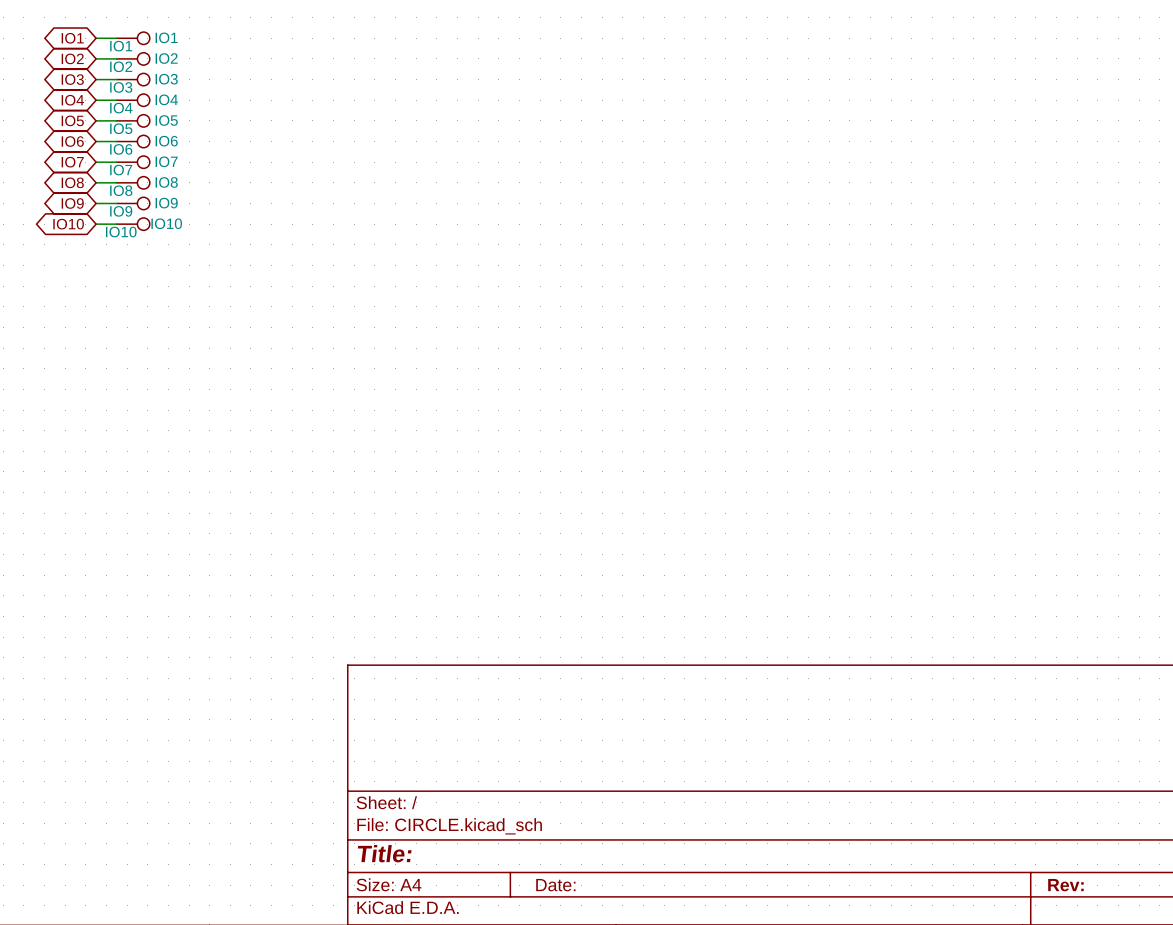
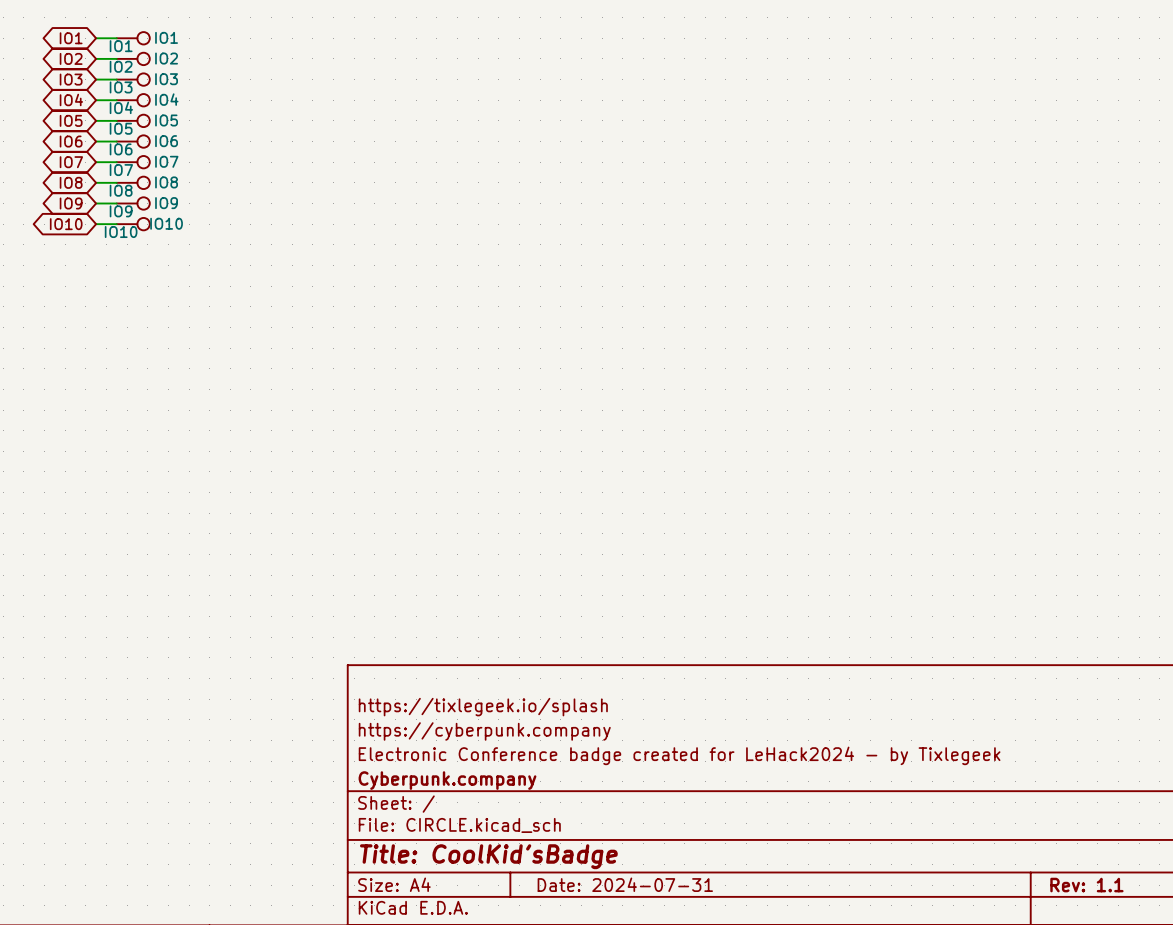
title block: none -> https://tixlegeek.io/splash (483, 707)
title block: none -> https://cyberpunk.company (484, 731)
title block: none -> Electronic Conference badge created for LeHack2024 - by Tixlegeek (679, 755)
title block: none -> Cyberpunk.company (447, 780)
title block: Title: (384, 853) -> Title: CoolKid'sBadge (488, 856)
title block: Date: (555, 885) -> Date: 2024-07-31 (625, 884)
title block: Rev: (1065, 885) -> Rev: 1.1 (1086, 885)

